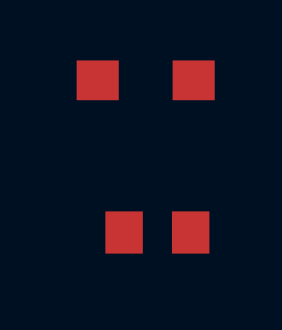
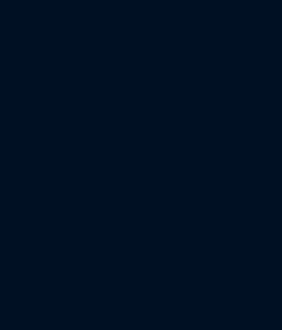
part: (145, 80) -> none
part: (157, 232) -> none

